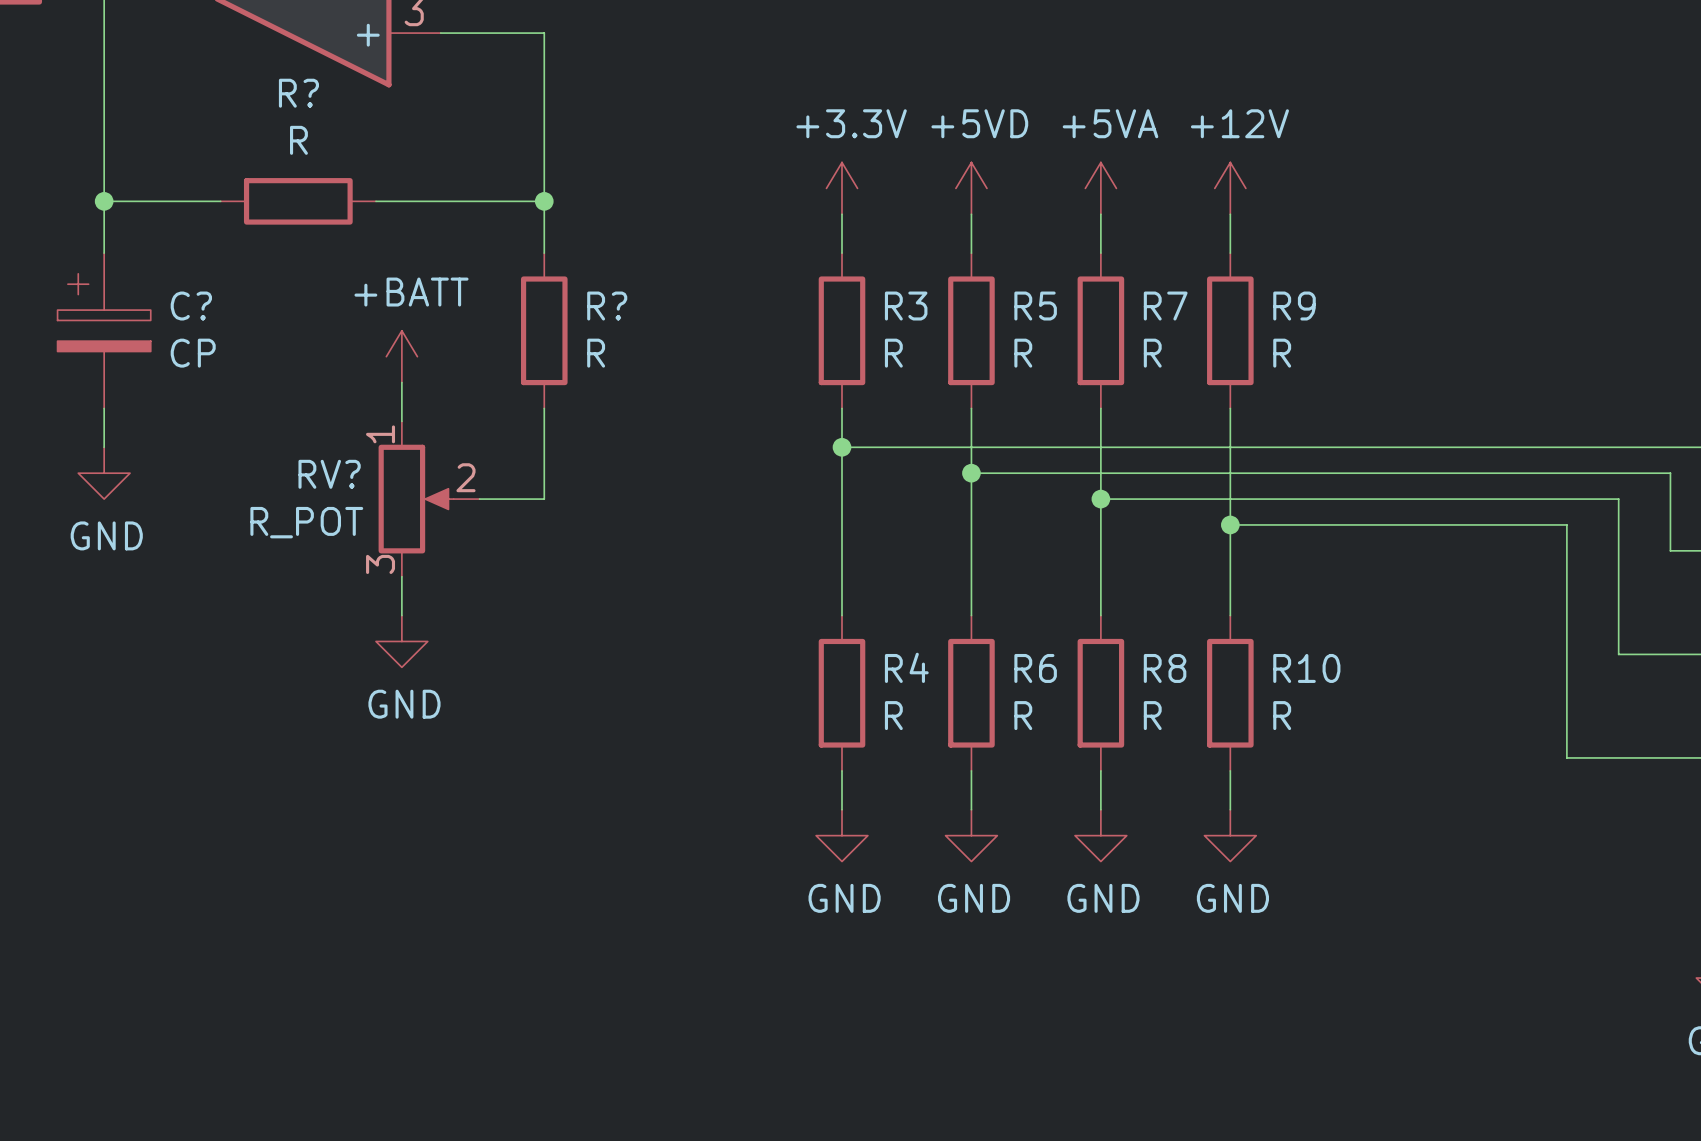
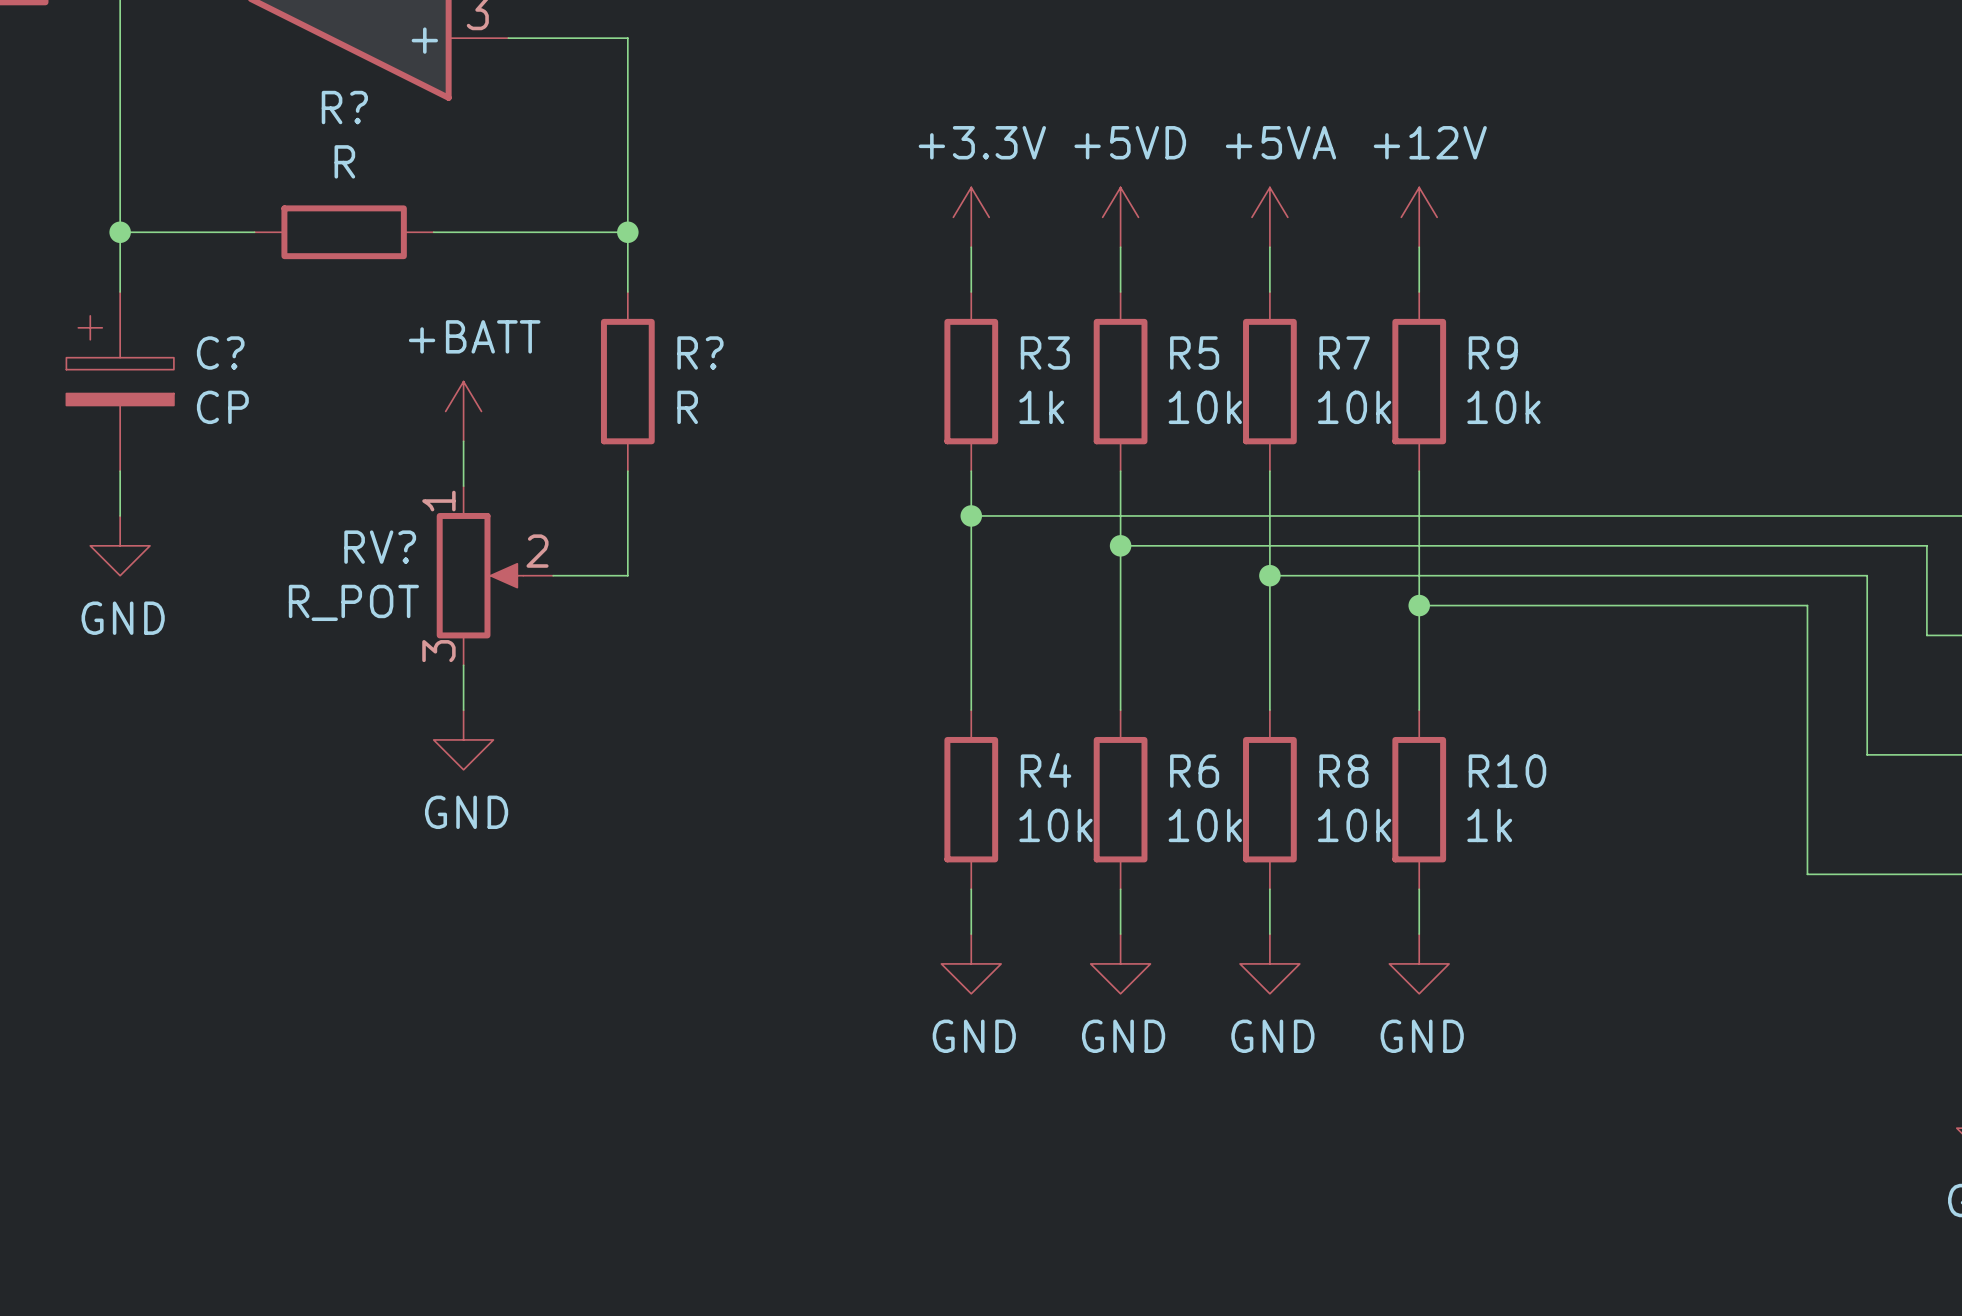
R3 value: R (893, 353) -> 1k (1041, 407)
R5 value: R (1023, 353) -> 10k (1205, 407)
R7 value: R (1152, 353) -> 10k (1354, 407)
R9 value: R (1282, 353) -> 10k (1503, 407)
R4 value: R (893, 715) -> 10k (1055, 825)
R6 value: R (1023, 715) -> 10k (1205, 825)
R8 value: R (1152, 715) -> 10k (1354, 825)
R10 value: R (1282, 715) -> 1k (1489, 825)

